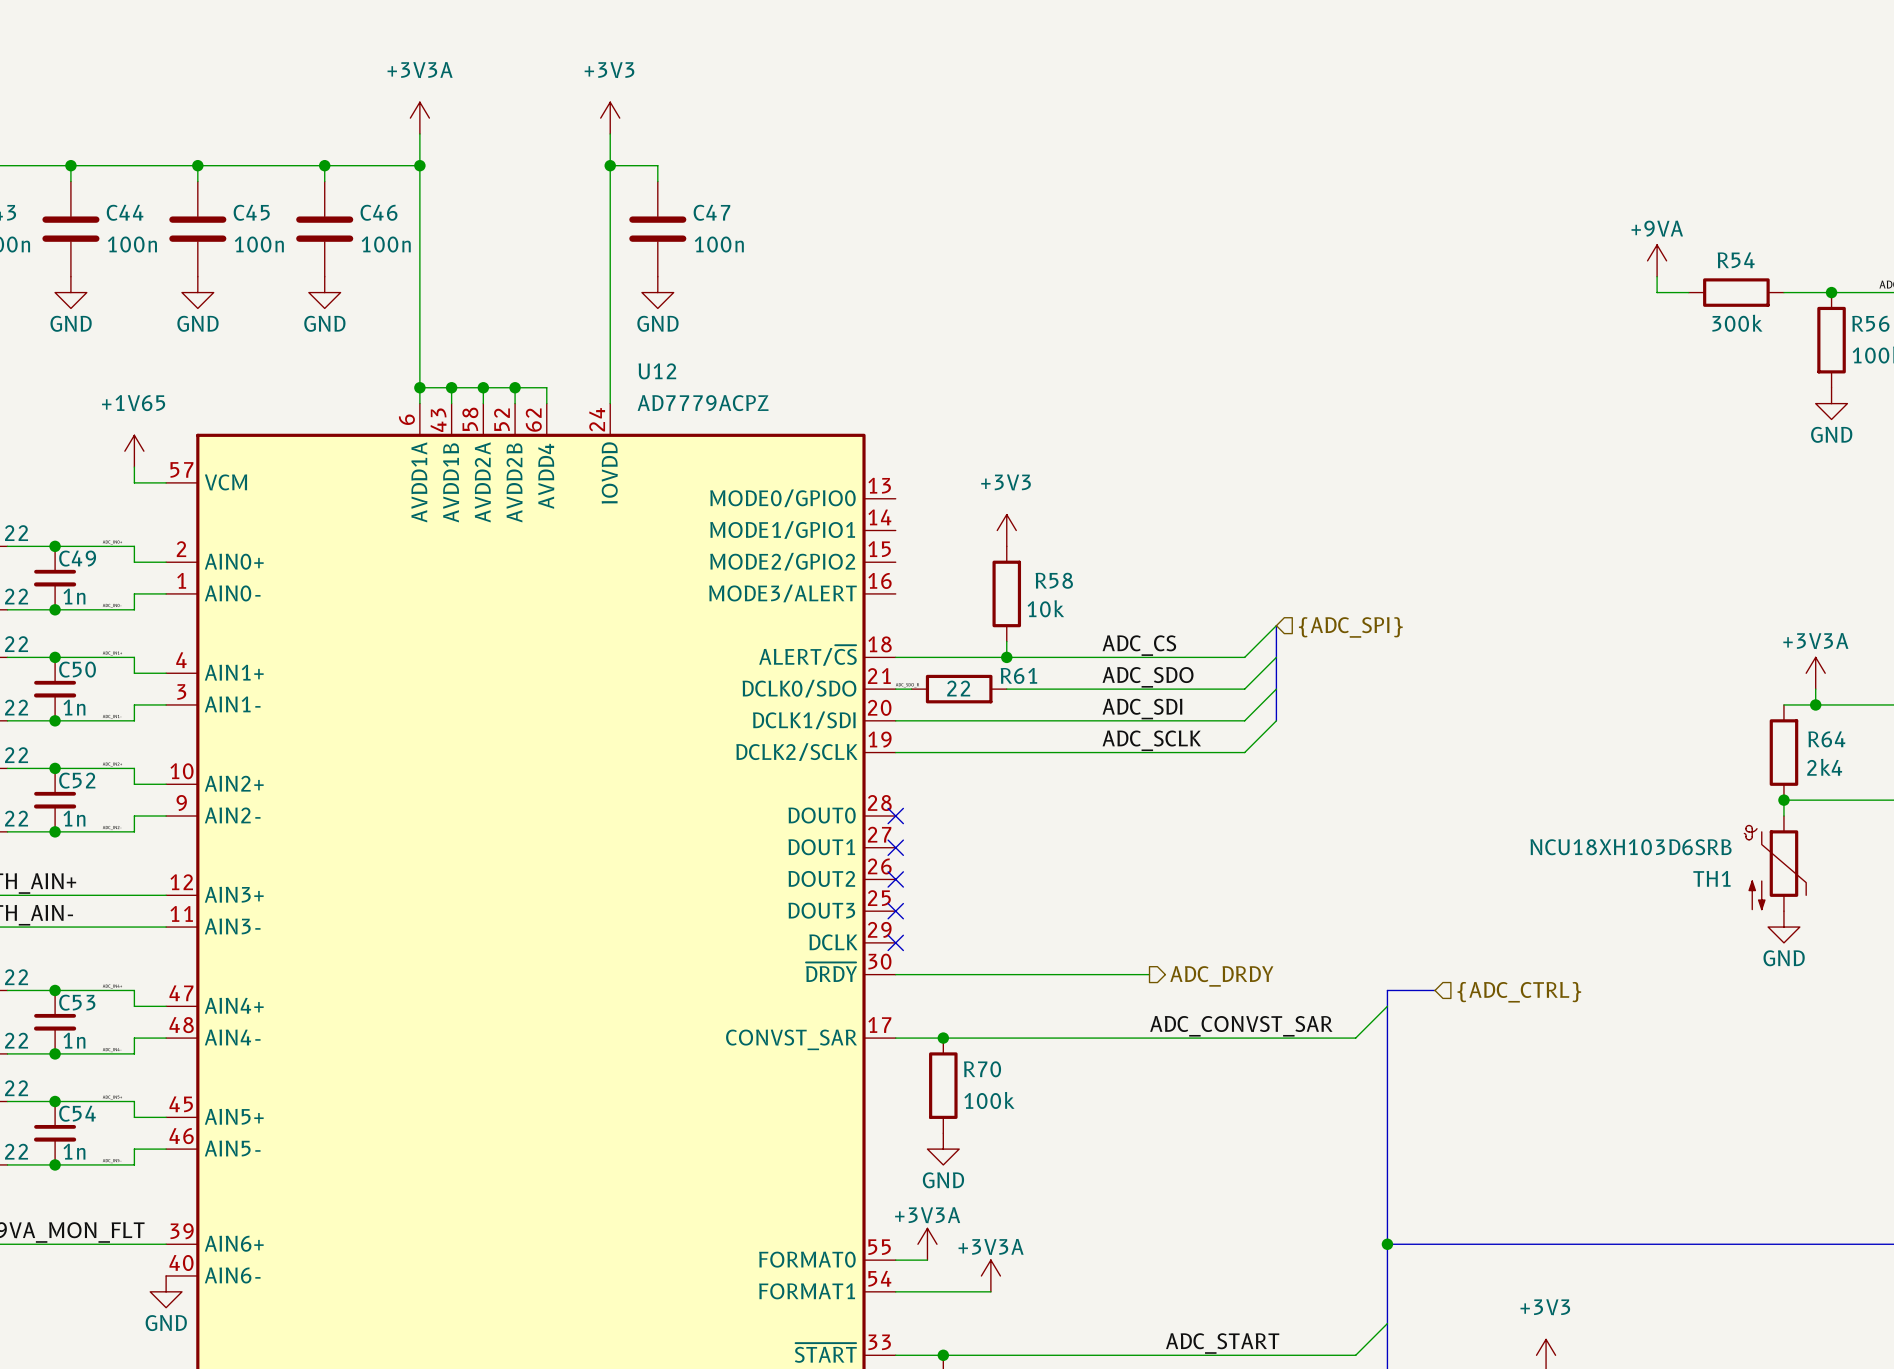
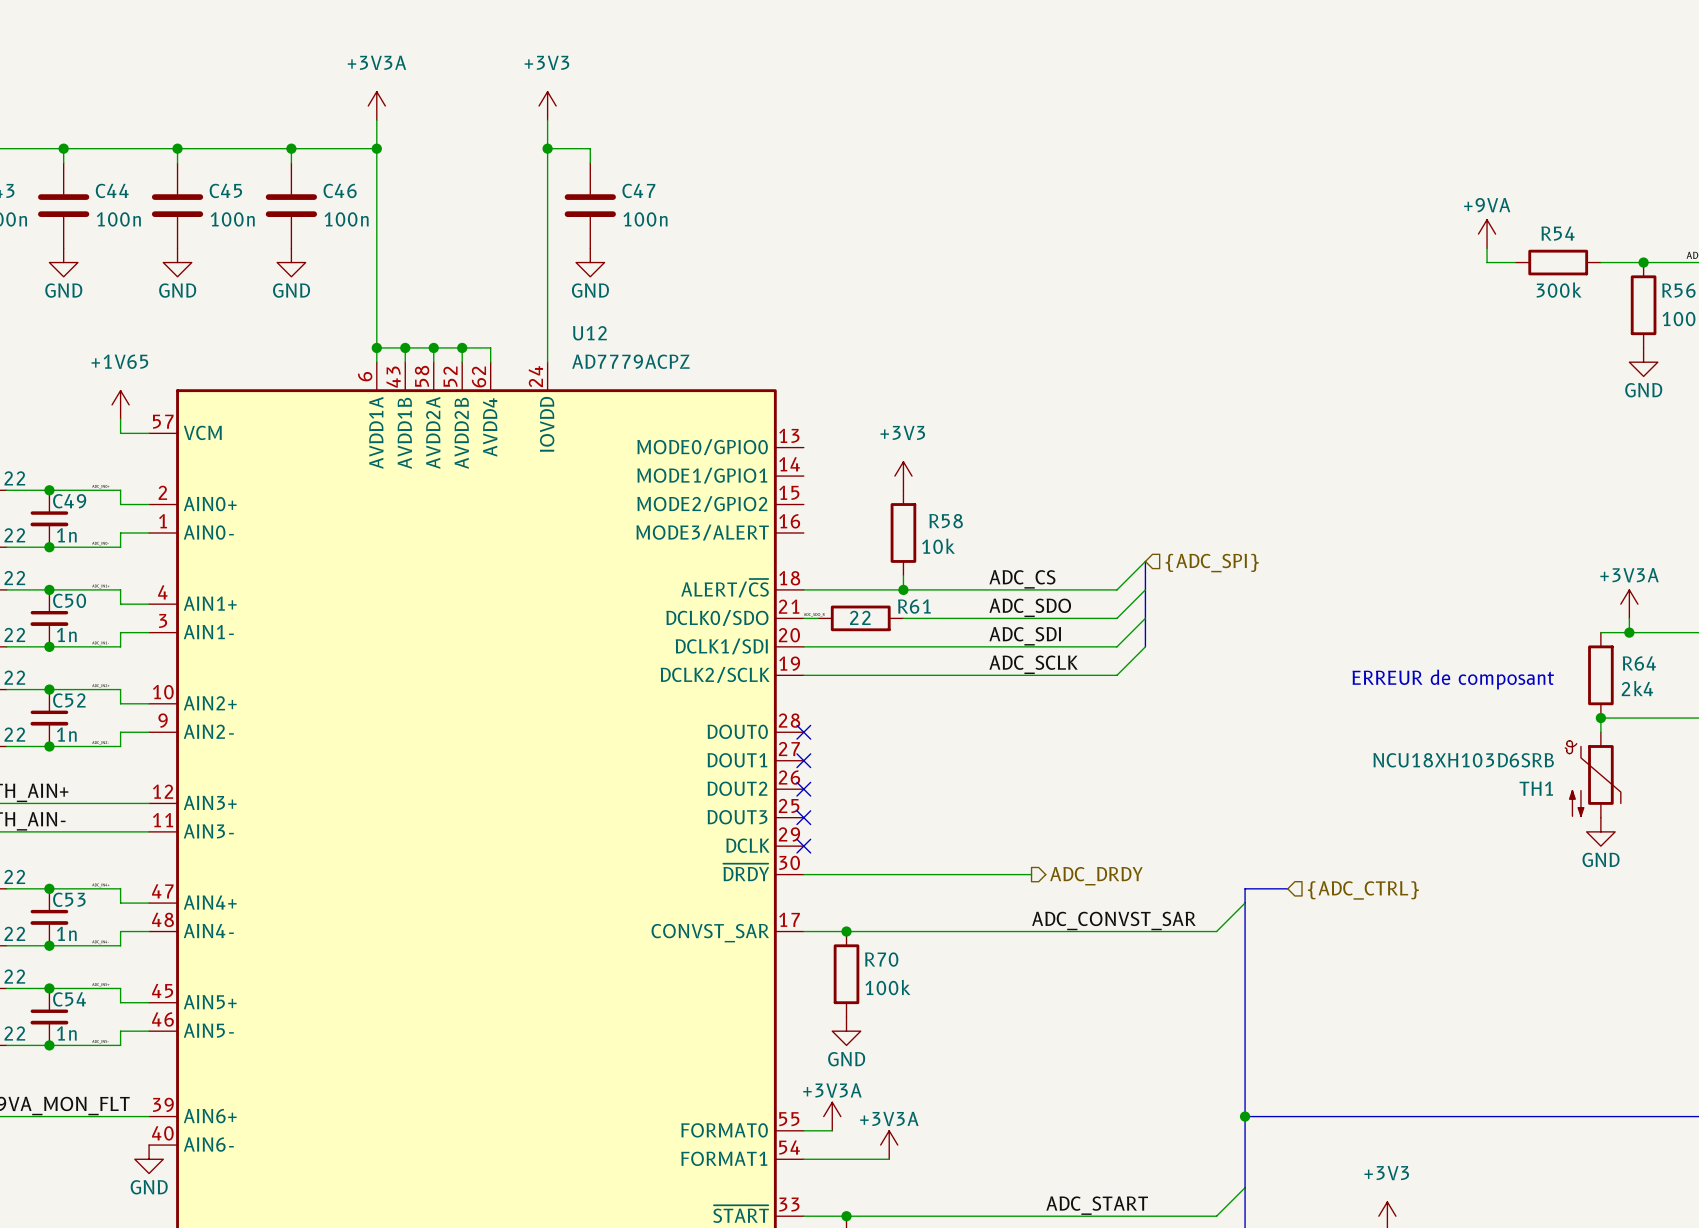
text: none -> ERREUR de composant (1453, 679)

